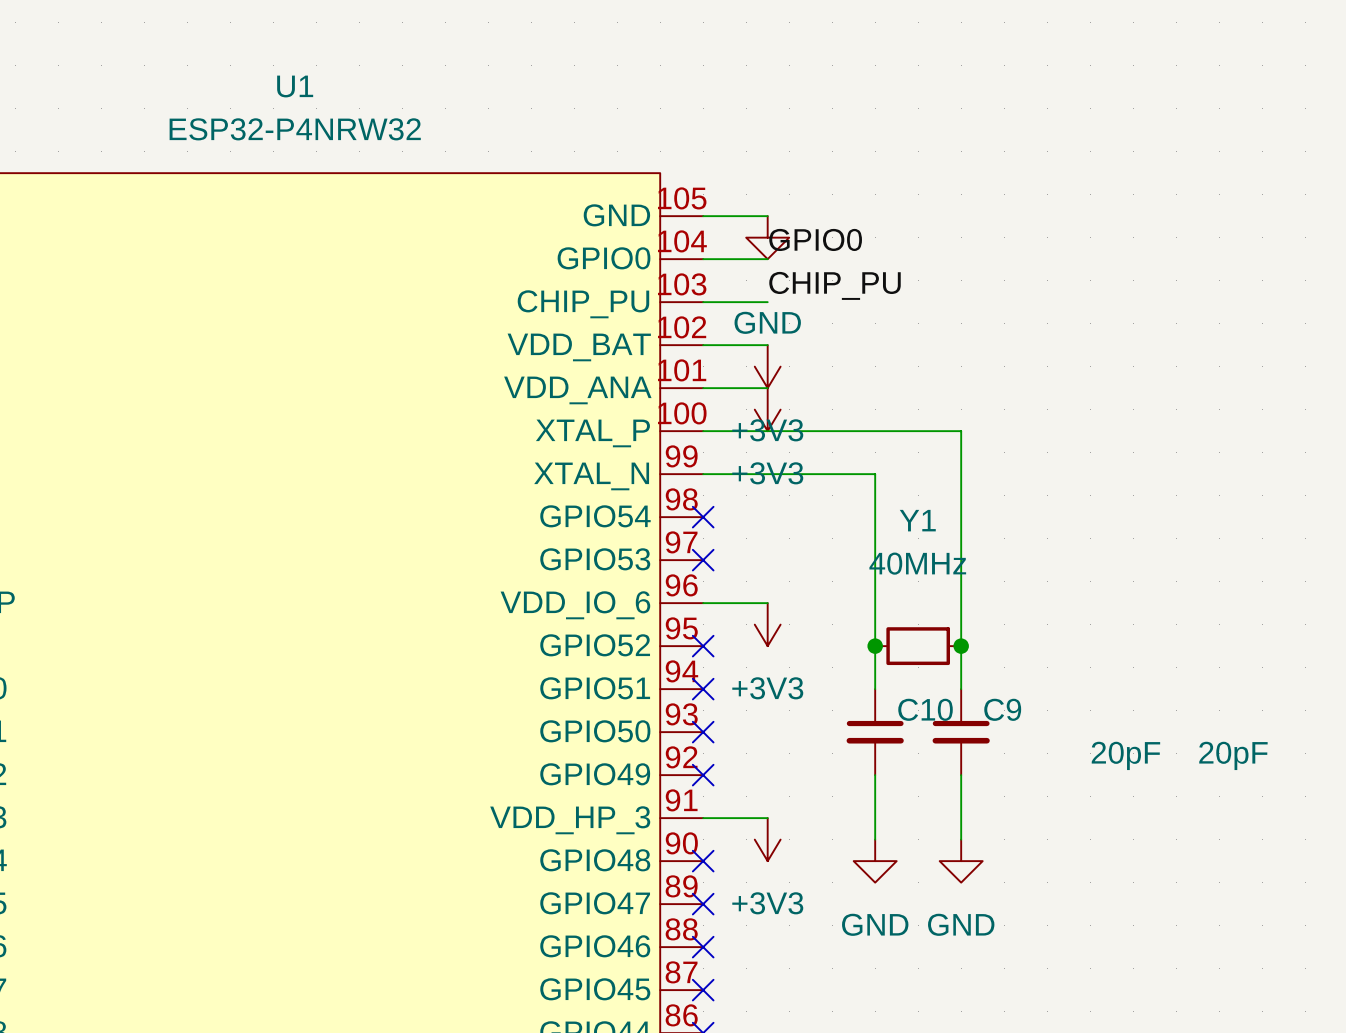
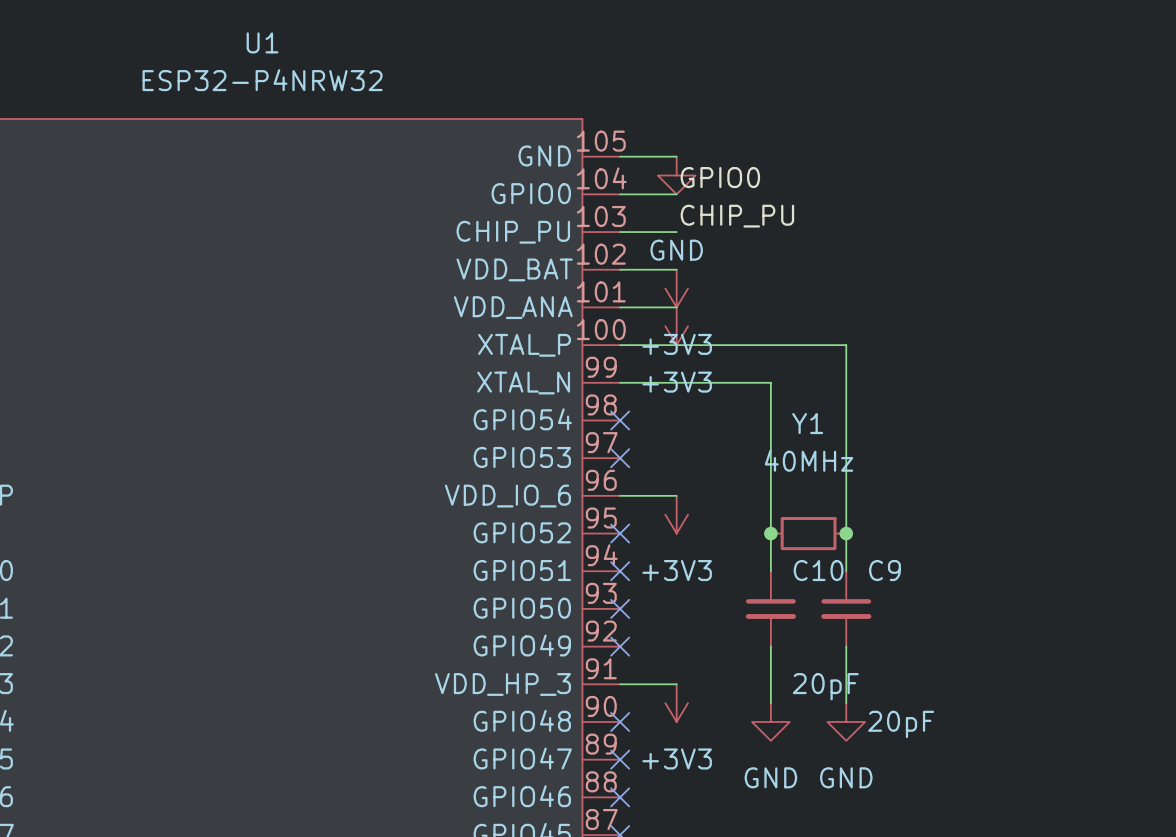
C10 name position: C10 (925, 709) -> C10 (818, 570)
C9 name position: C9 (1002, 709) -> C9 (885, 570)
C10 value position: 20pF (1125, 755) -> 20pF (825, 686)
C9 value position: 20pF (1233, 755) -> 20pF (901, 724)

